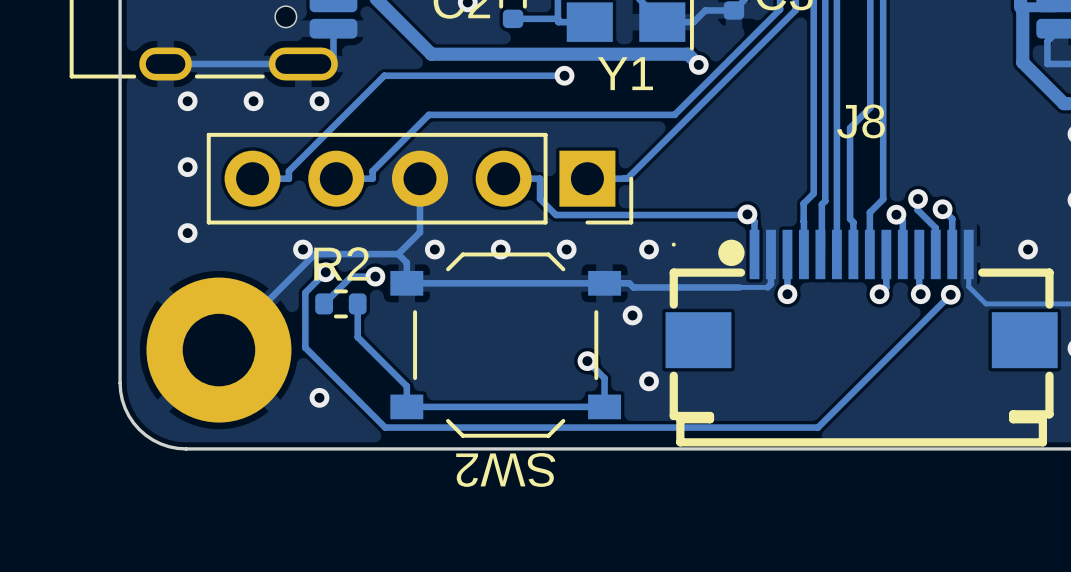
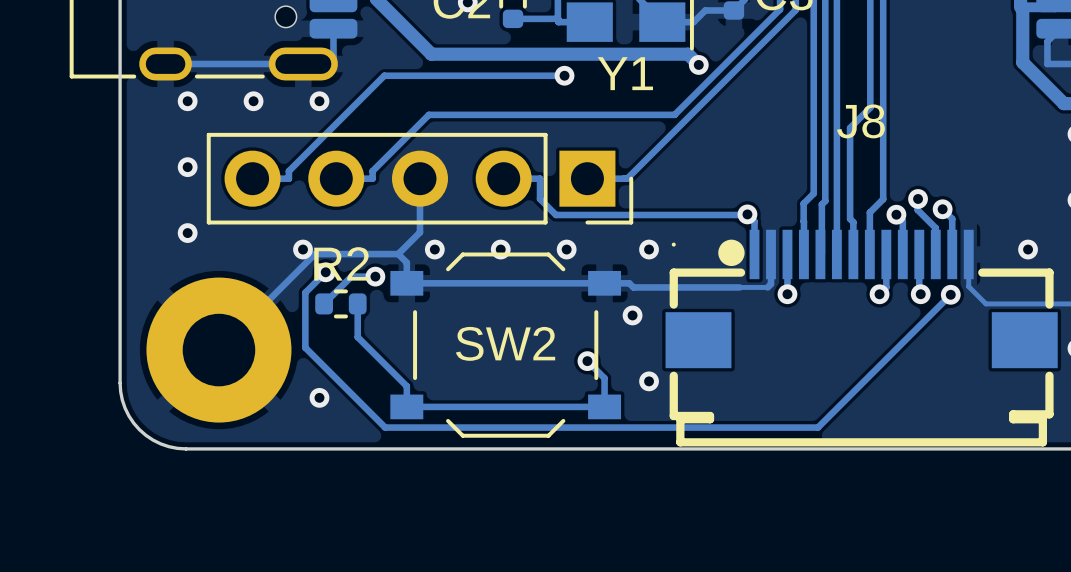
SW2 name rotation: 0° (505, 469) -> 180° (505, 343)

